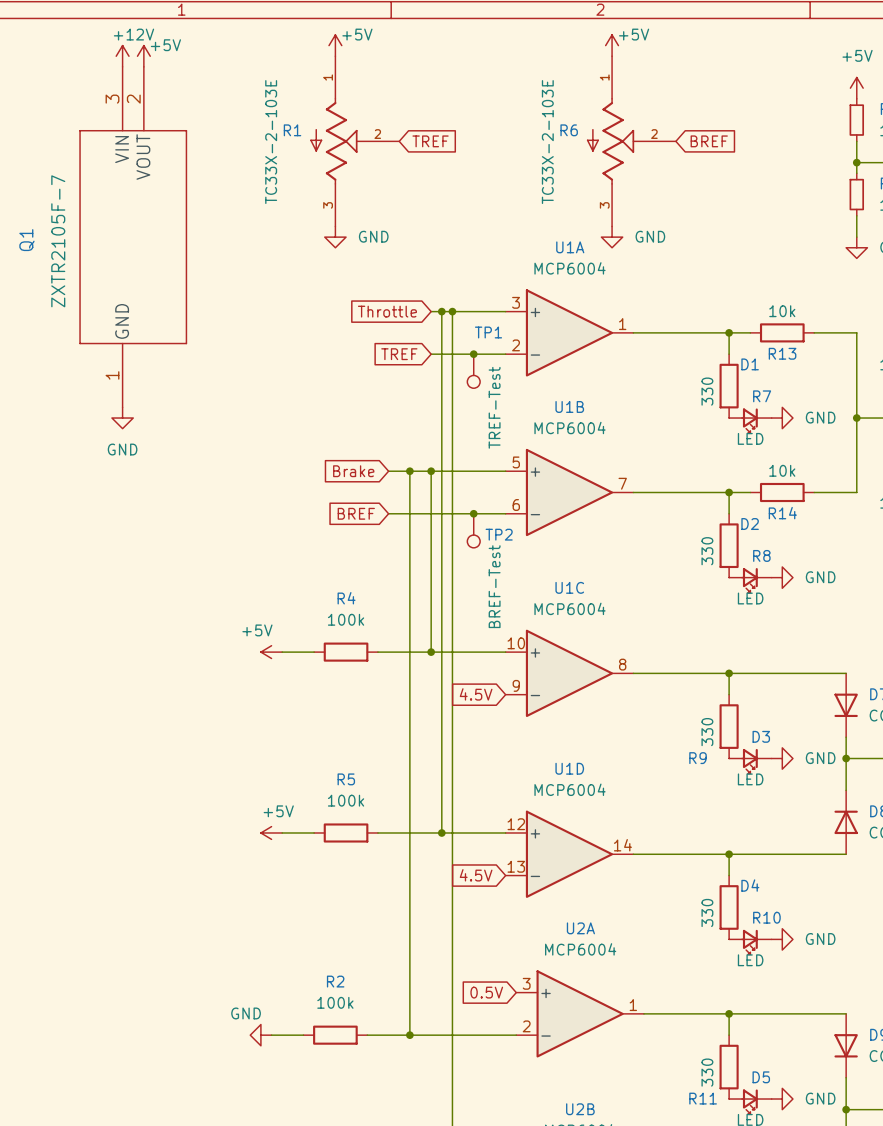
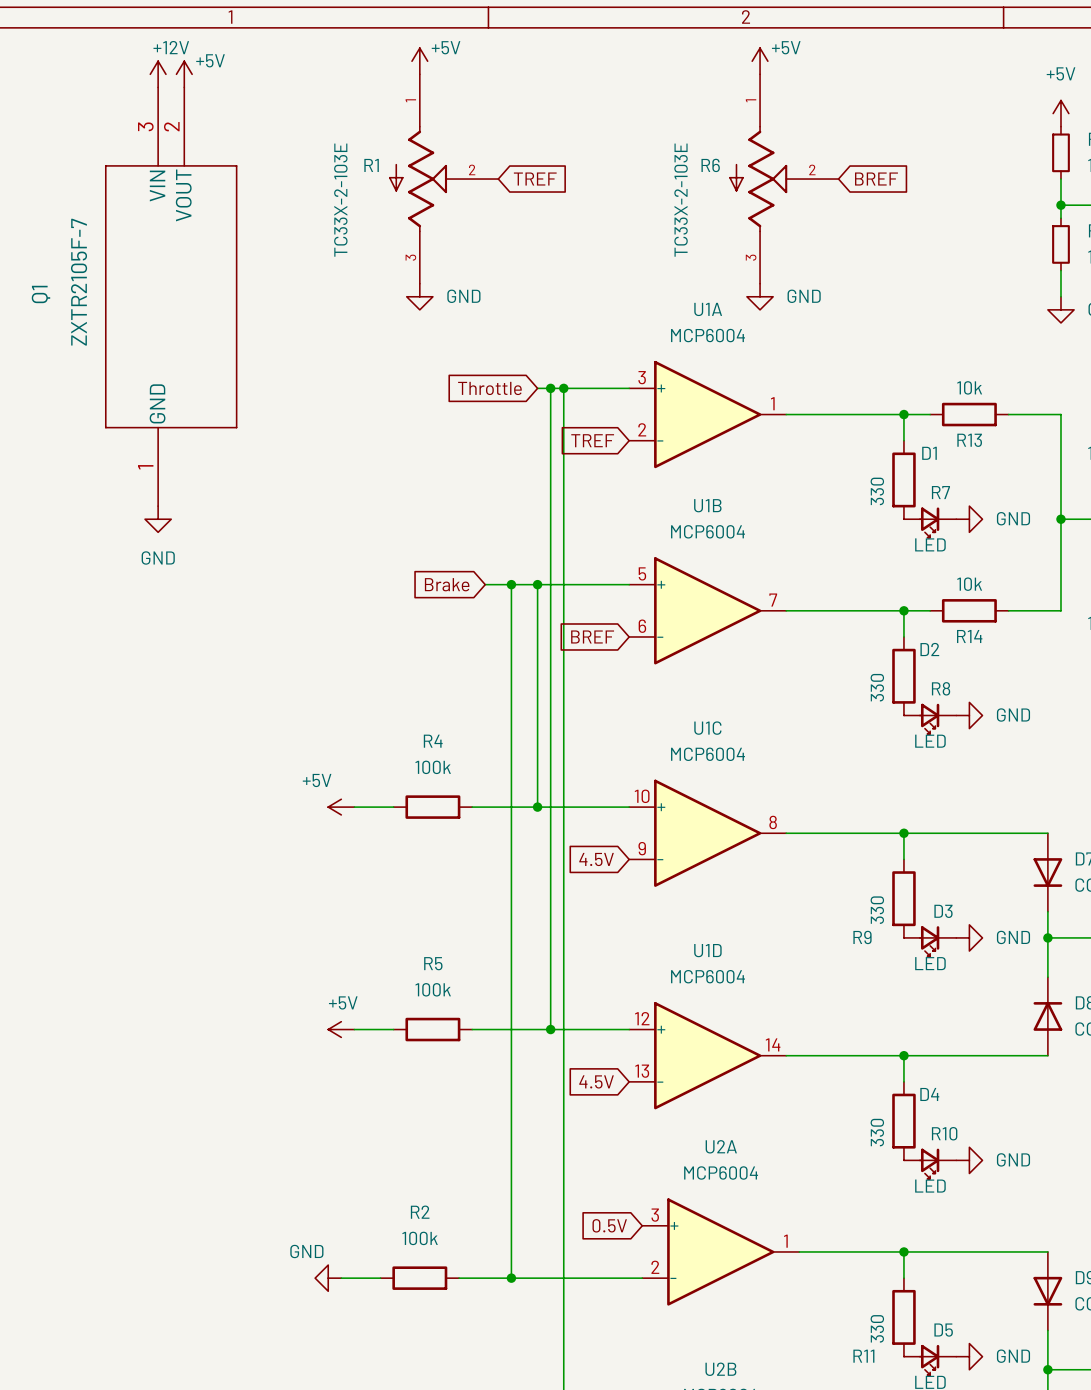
global label position: TREF (399, 354) -> TREF (592, 440)
wire: (431, 354) (505, 354) -> none
junction: (473, 354) -> none
TP1: TREF-Test (473, 371) -> none
global label position: BREF (356, 513) -> BREF (592, 636)
wire: (388, 513) (505, 513) -> none
junction: (473, 513) -> none
TP2: BREF-Test (473, 530) -> none

